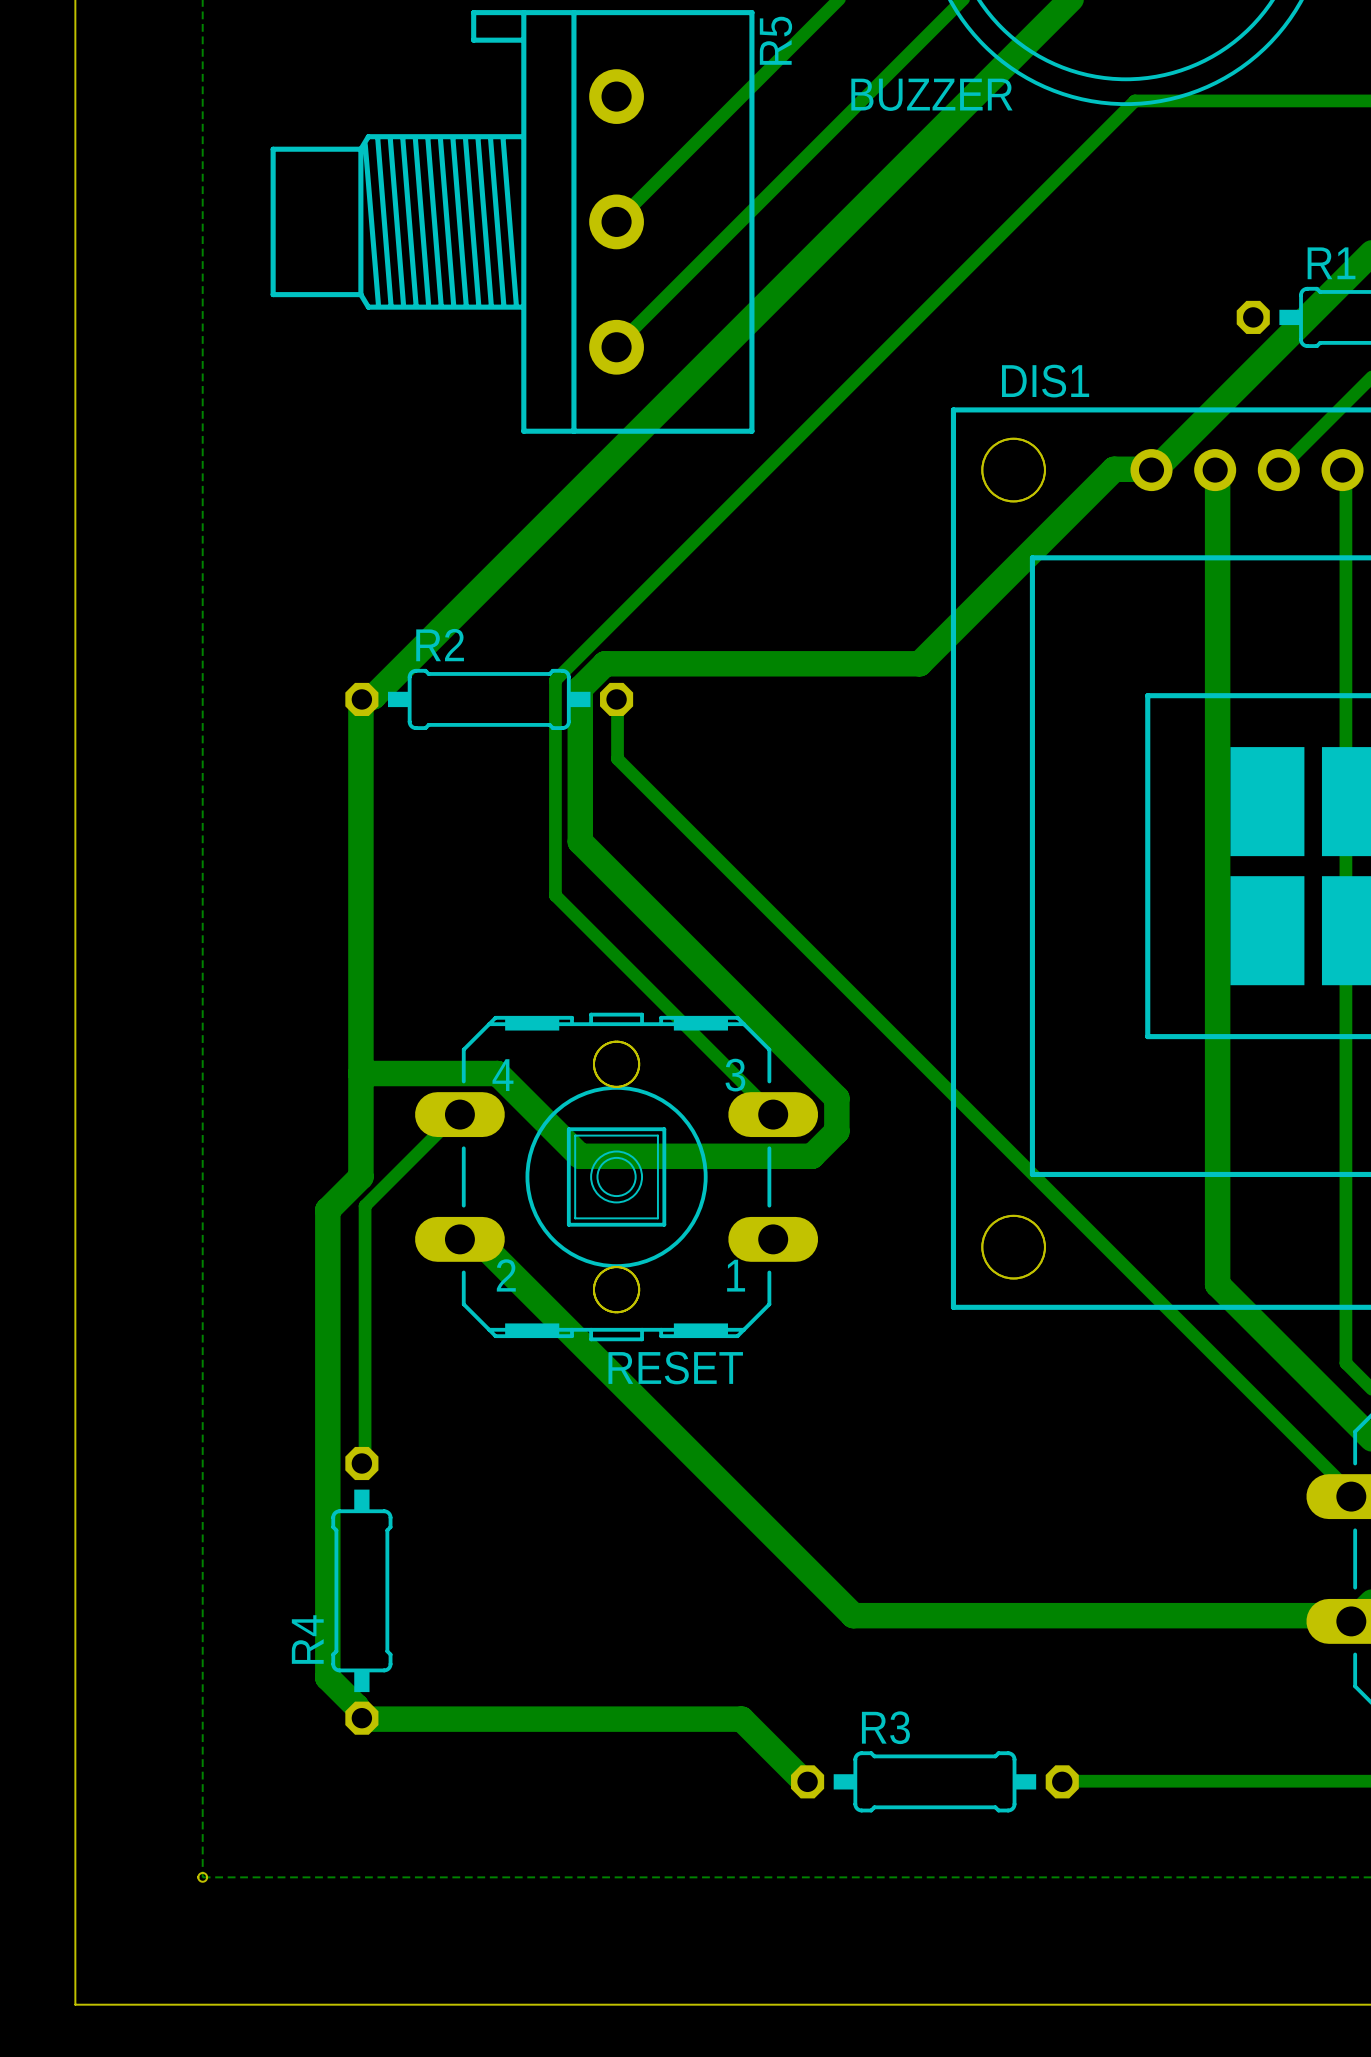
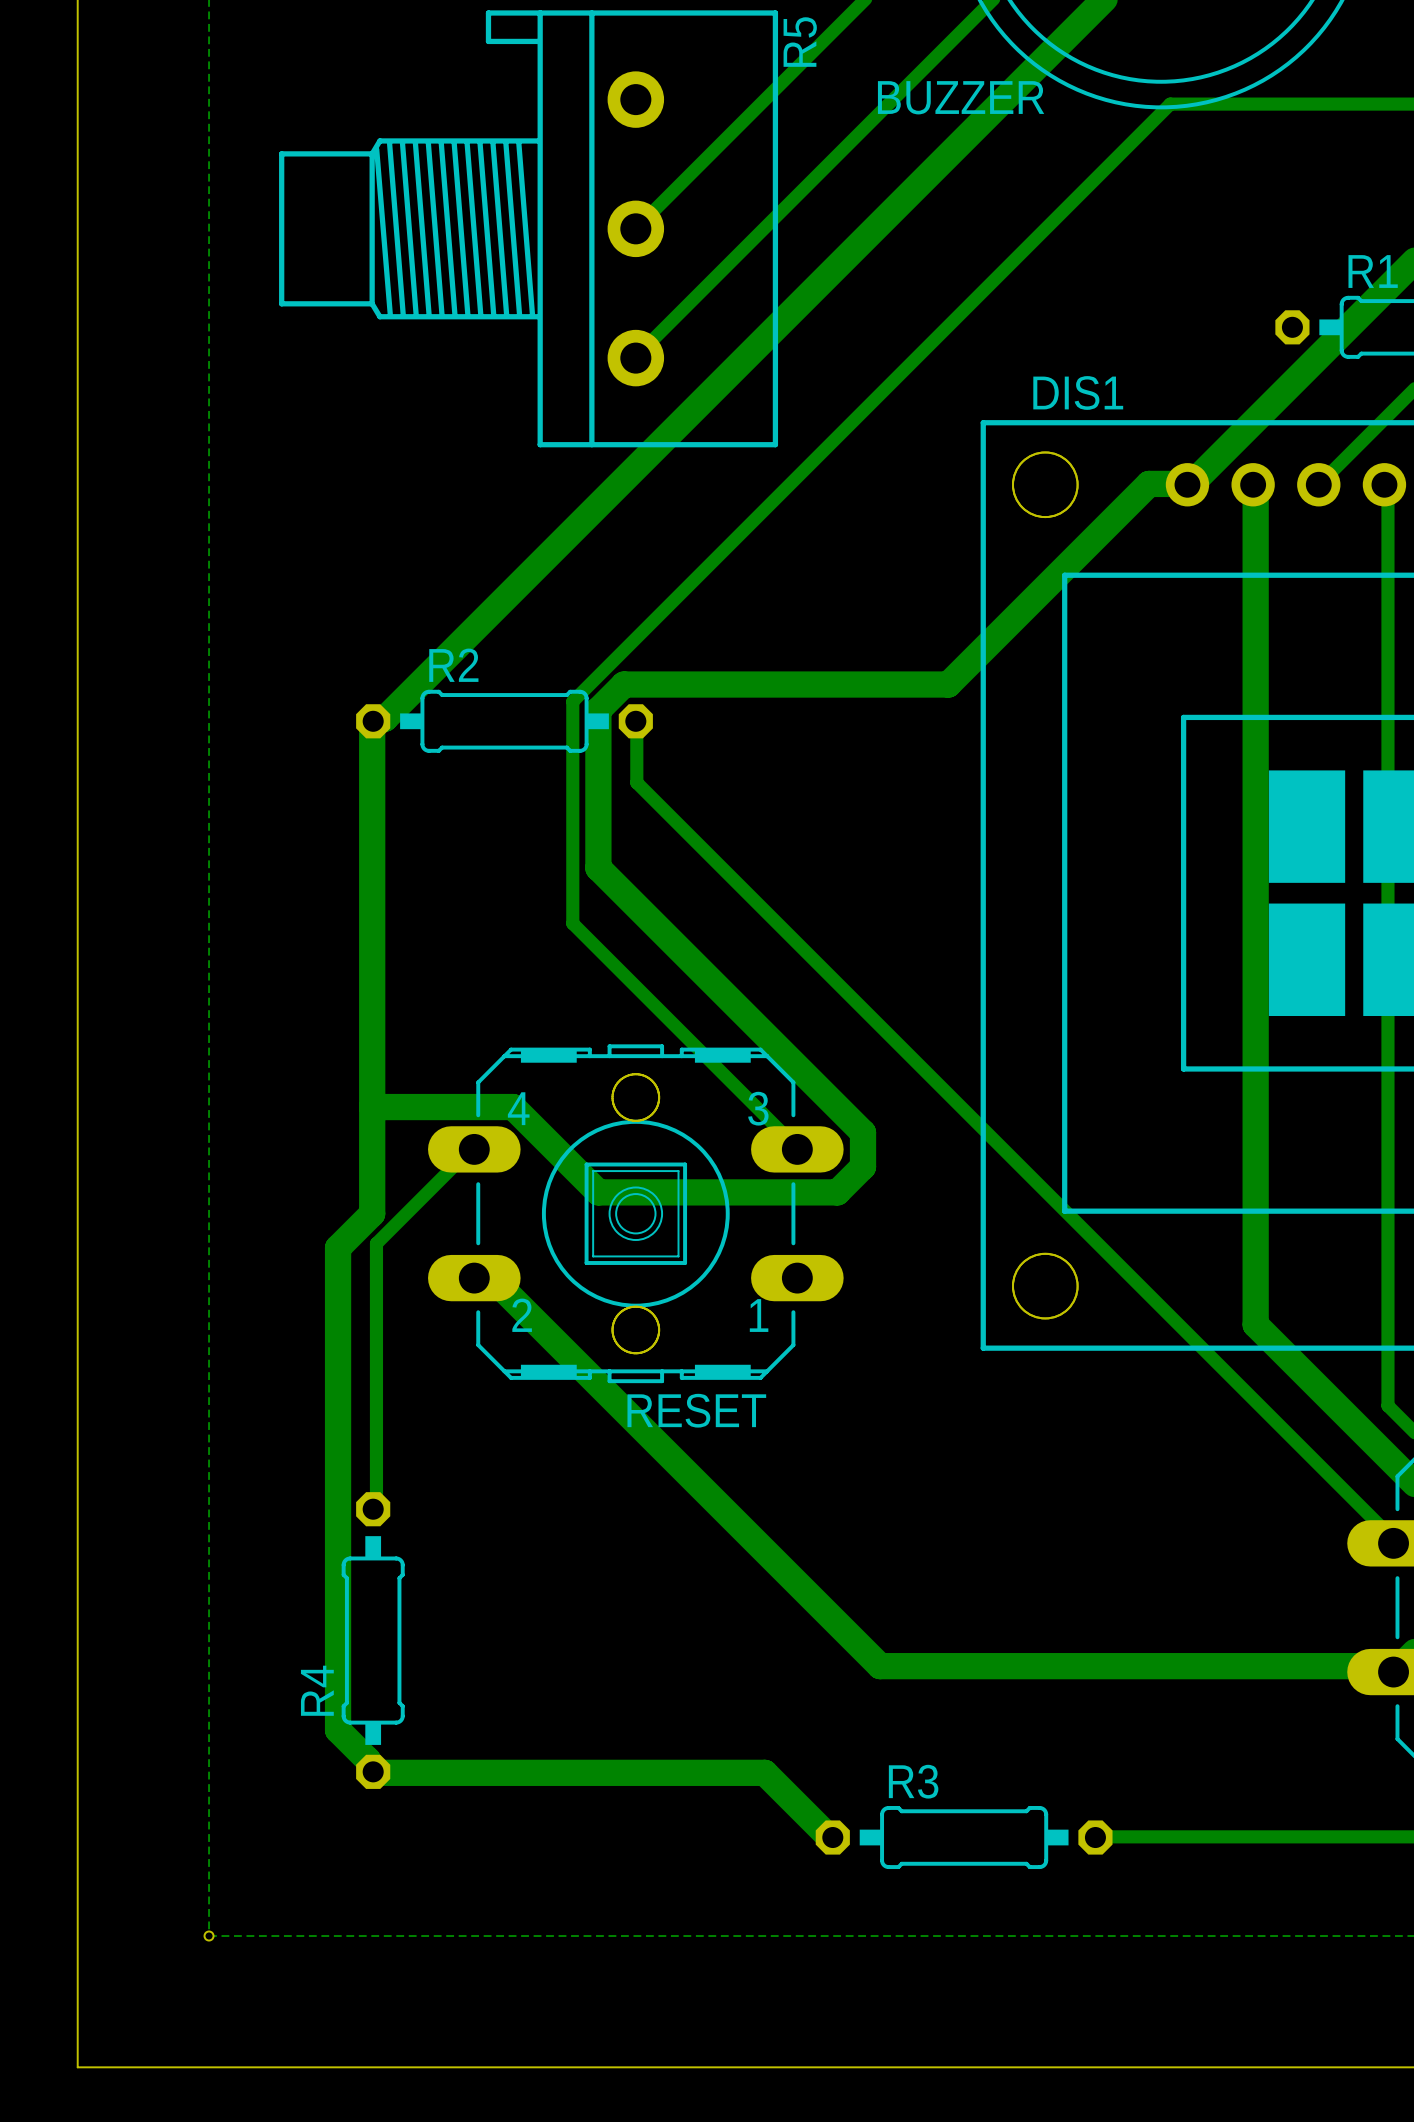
board edge: (198, 1876) (202, 1881) (207, 1877) (203, 1872) (198, 1876) -> none
hole: none -> (209, 1936)

